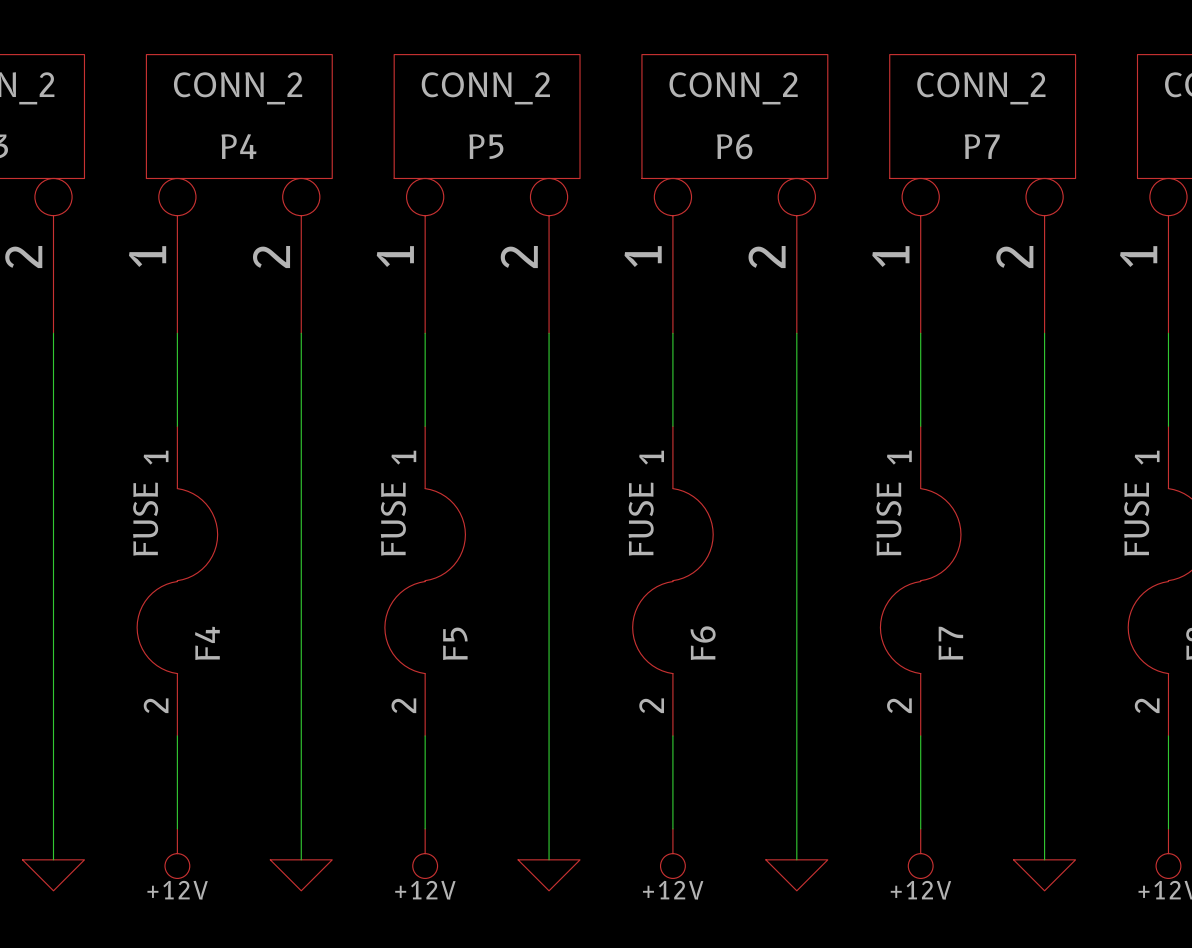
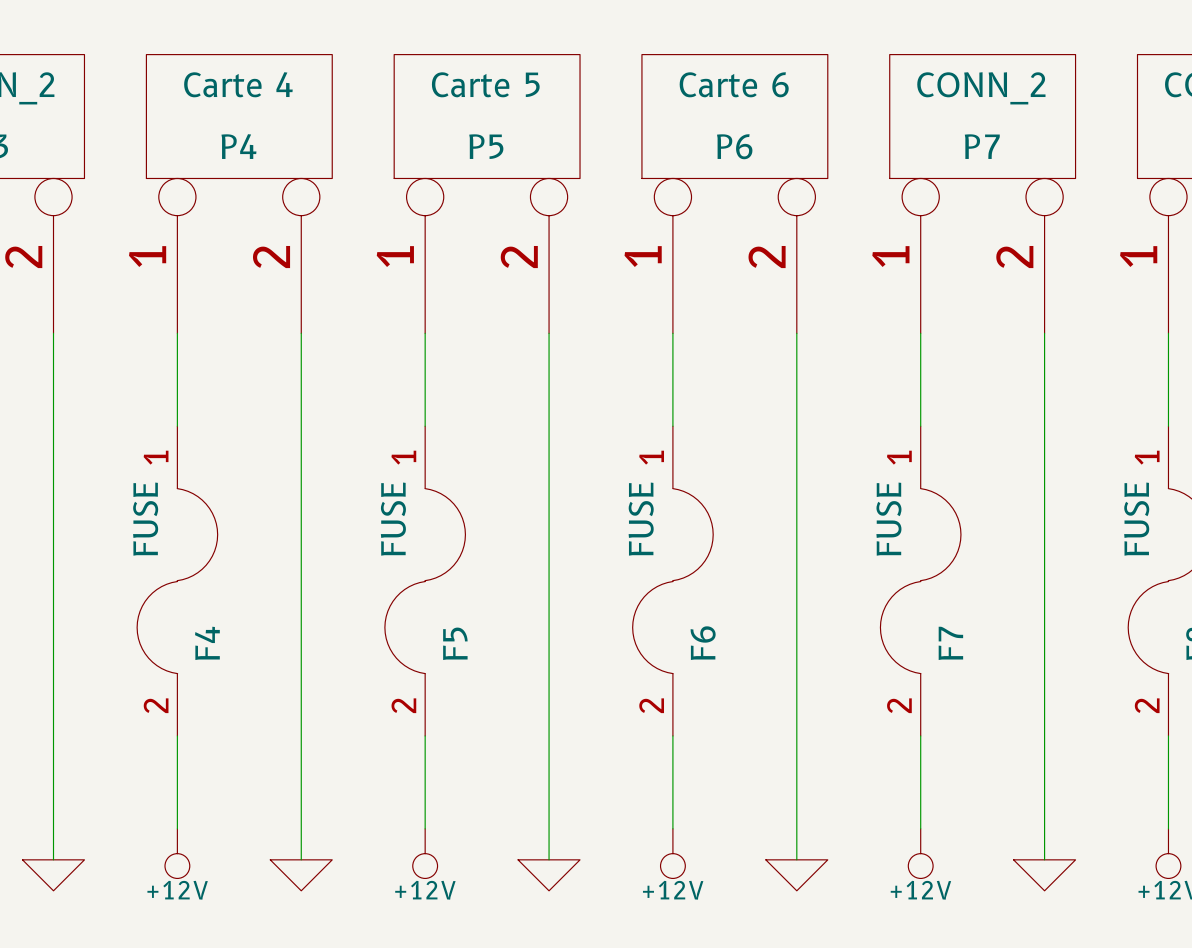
P4 value: CONN_2 (238, 88) -> Carte 4 (238, 84)
P5 value: CONN_2 (485, 88) -> Carte 5 (485, 84)
P6 value: CONN_2 (733, 88) -> Carte 6 (734, 84)

